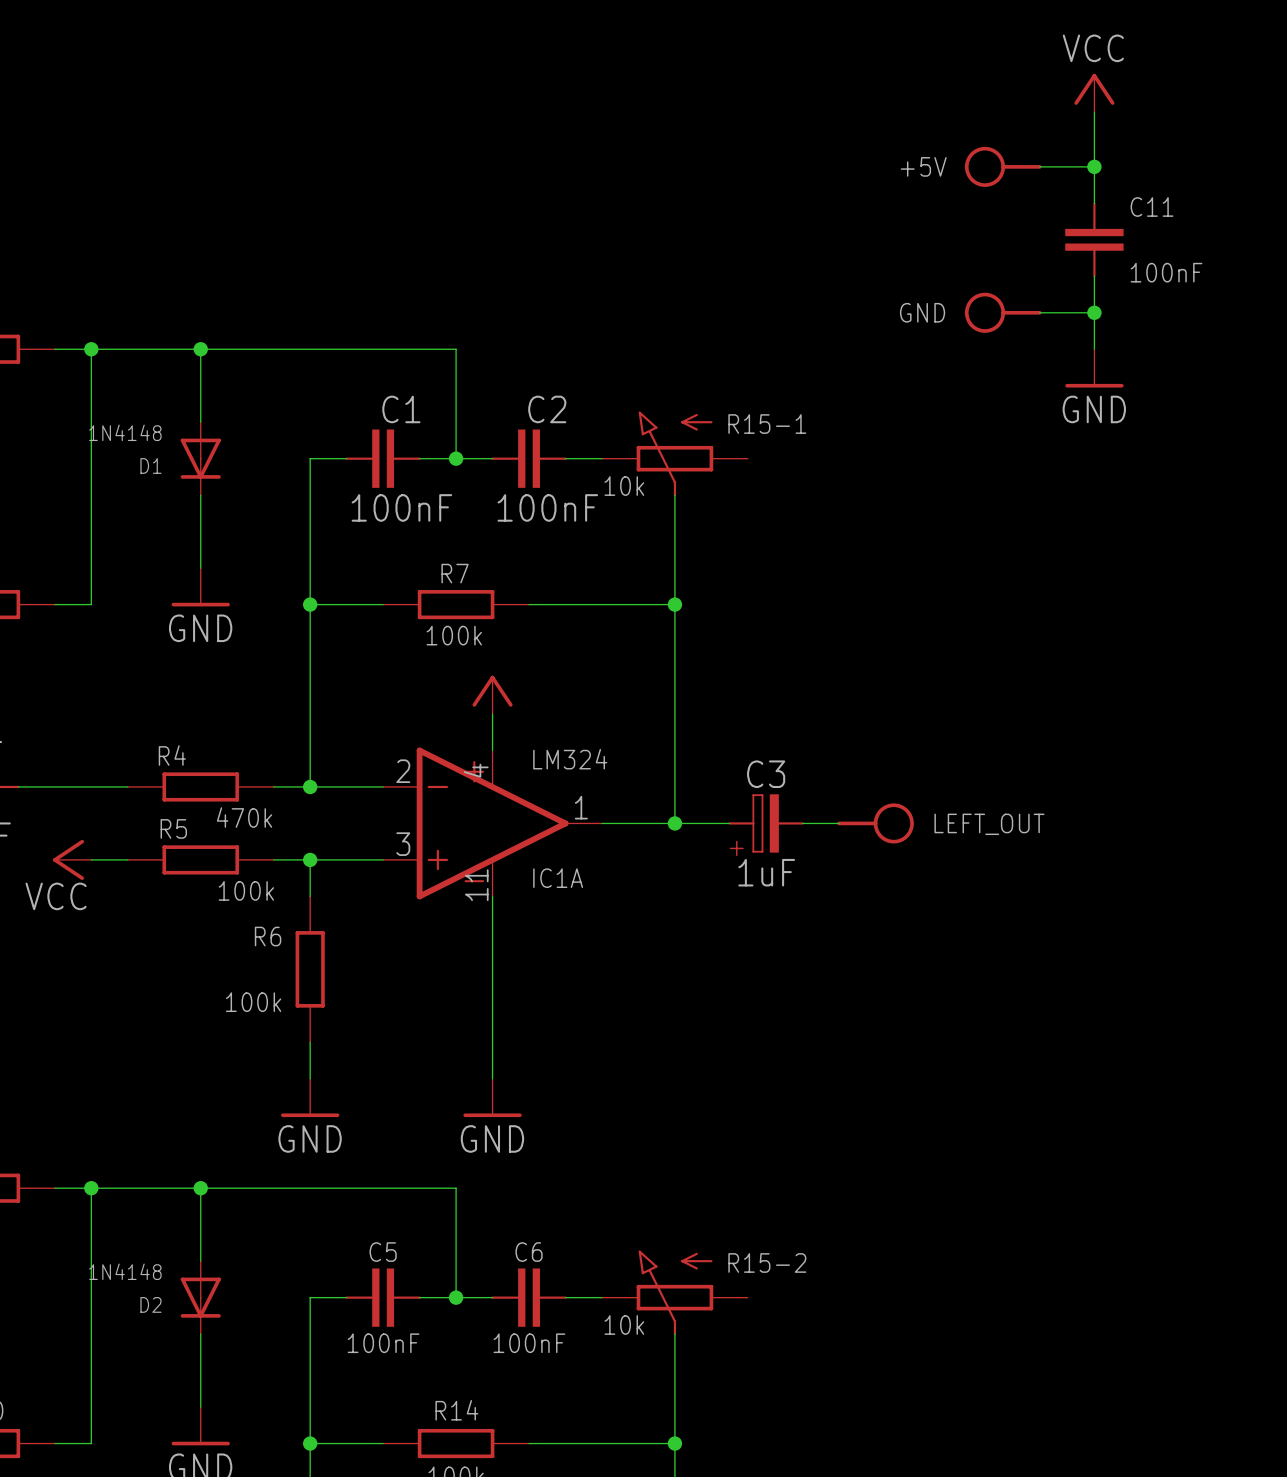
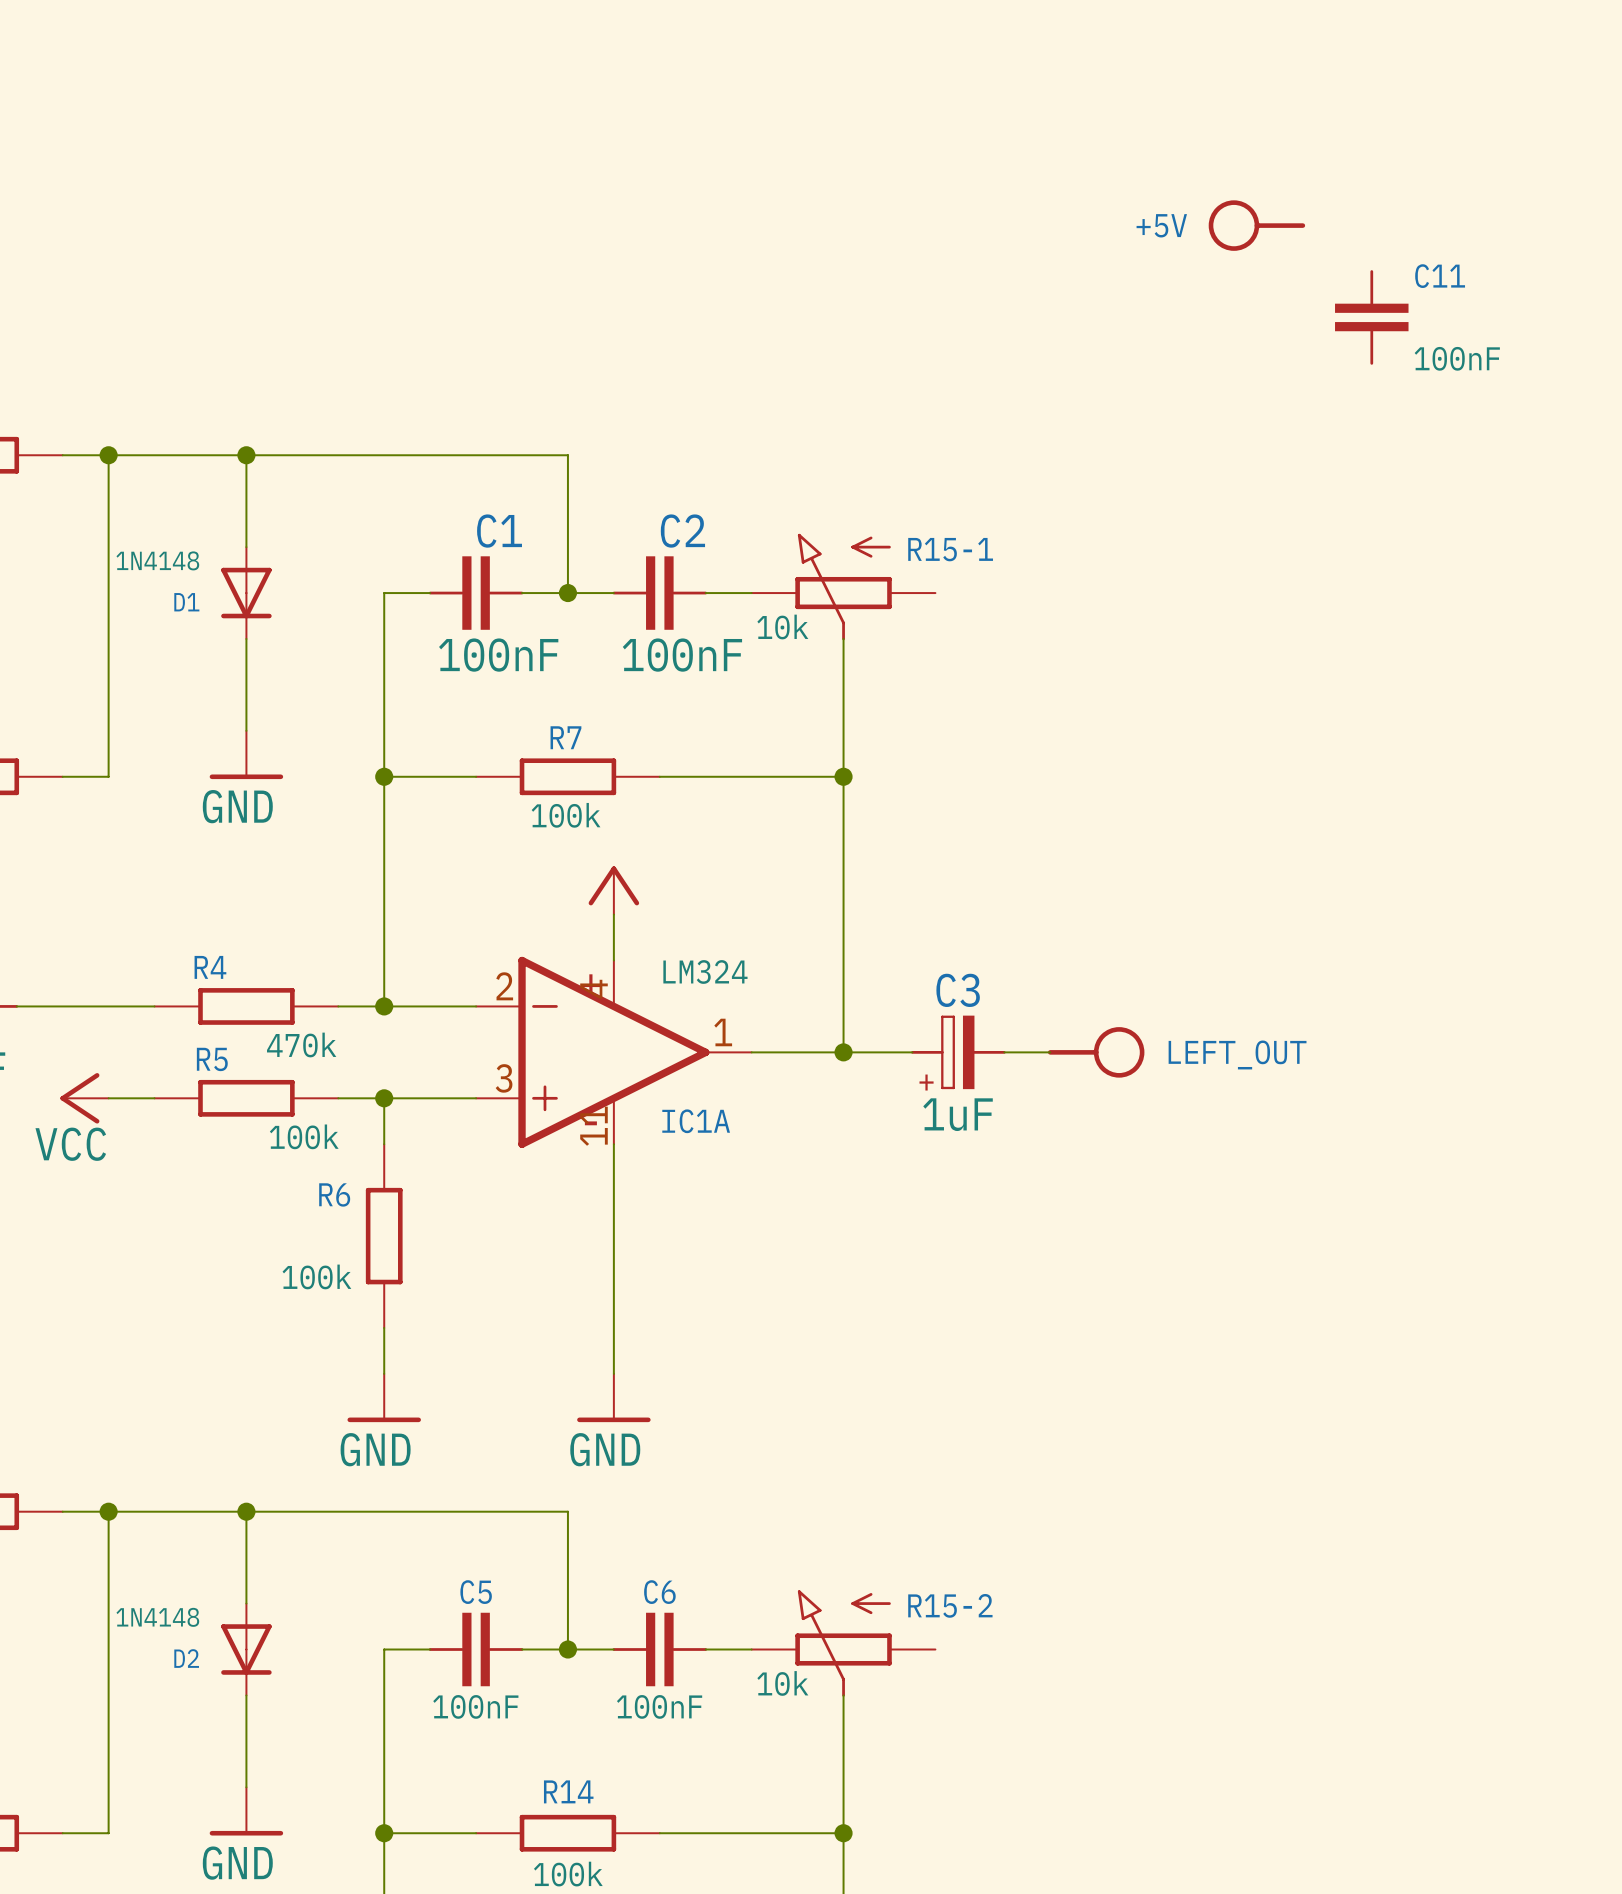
power symbol: VCC (1094, 93) -> none
wire: (1094, 112) (1094, 203) -> none
wire: (1039, 166) (1094, 166) -> none
junction: (1094, 166) -> none
wire: (1094, 276) (1094, 349) -> none
GND: (1003, 312) -> none
wire: (1039, 312) (1094, 312) -> none
junction: (1094, 312) -> none
power symbol: GND (1094, 368) -> none

